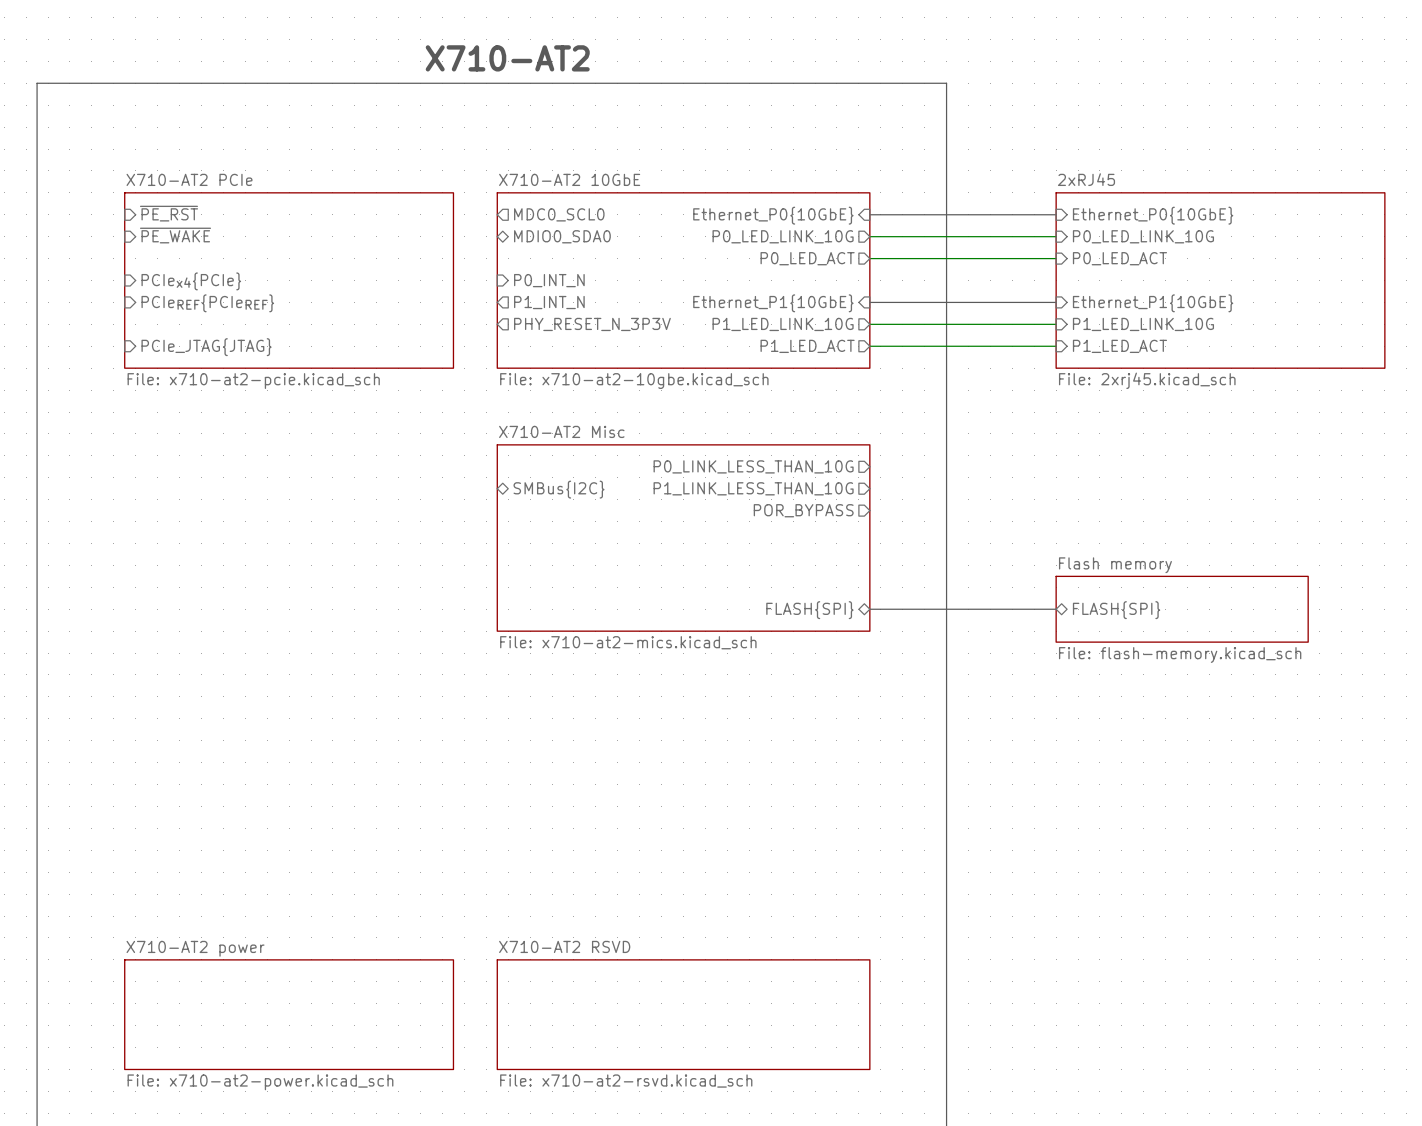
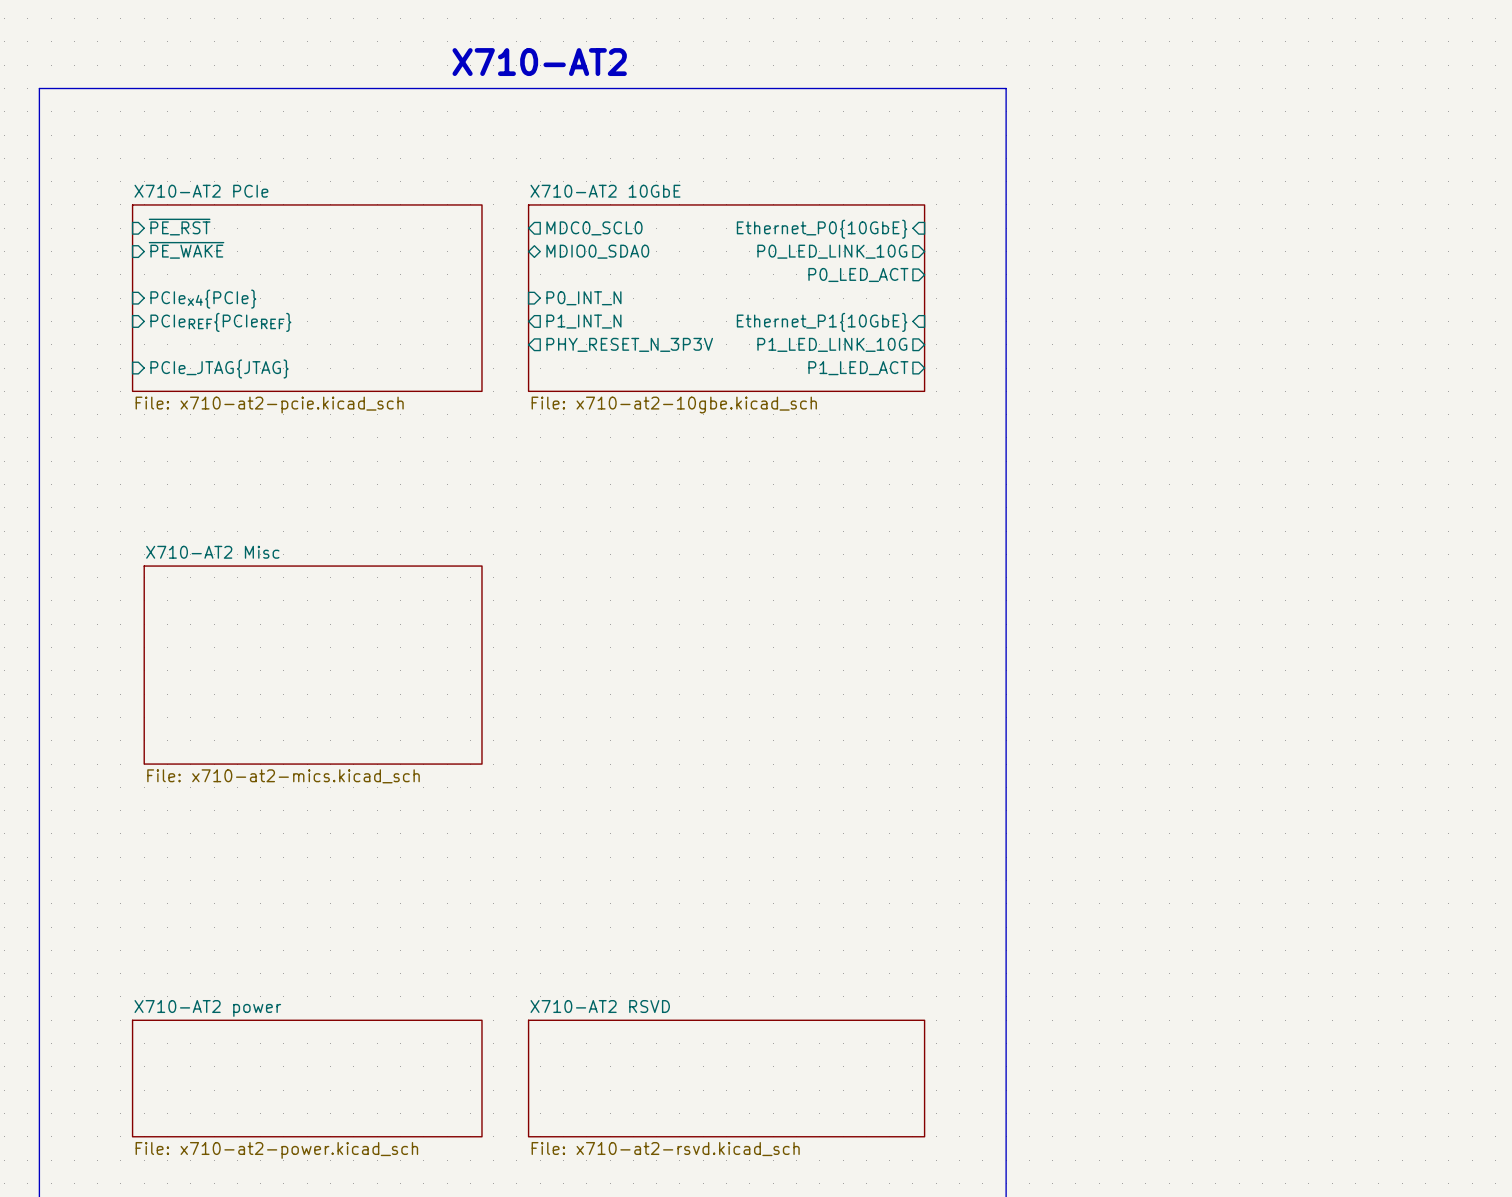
bus: (869, 214) (1056, 214) -> none
sheet pin: Ethernet_P0{10GbE} (1153, 215) -> none
wire: (869, 236) (1056, 236) -> none
sheet pin: P0_LED_LINK_10G (1143, 236) -> none
wire: (869, 258) (1056, 258) -> none
sheet pin: P0_LED_ACT (1119, 258) -> none
sheet 2xRJ45: File: 2xrj45.kicad_sch (1220, 280) -> none
bus: (869, 302) (1056, 302) -> none
sheet pin: Ethernet_P1{10GbE} (1153, 303) -> none
wire: (869, 324) (1056, 324) -> none
sheet pin: P1_LED_LINK_10G (1143, 324) -> none
wire: (869, 346) (1056, 346) -> none
sheet pin: P1_LED_ACT (1119, 346) -> none
sheet X710-AT2 Misc name position: X710-AT2 Misc (561, 431) -> X710-AT2 Misc (212, 552)
sheet X710-AT2 Misc shape: [496, 444, 871, 632] -> [143, 565, 483, 765]
sheet pin: P0_LINK_LESS_THAN_10G (753, 466) -> none
sheet pin: P1_LINK_LESS_THAN_10G (753, 488) -> none
sheet pin: SMBus{I2C} (559, 489) -> none
sheet pin: POR_BYPASS (803, 510) -> none
bus: (869, 609) (1056, 609) -> none
sheet Flash memory: File: flash-memory.kicad_sch (1182, 609) -> none
sheet pin: FLASH{SPI} (809, 610) -> none
sheet pin: FLASH{SPI} (1116, 610) -> none
sheet X710-AT2 Misc value position: File: x710-at2-mics.kicad_sch (628, 642) -> File: x710-at2-mics.kicad_sch (283, 776)

